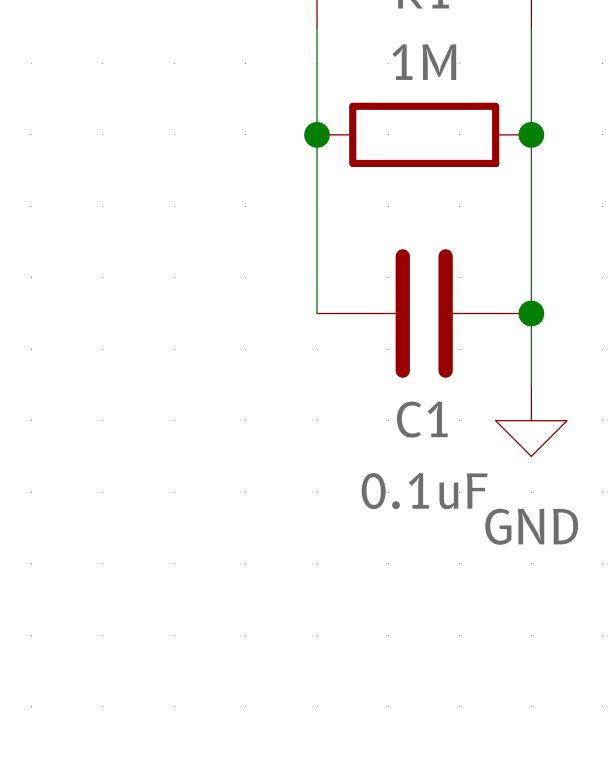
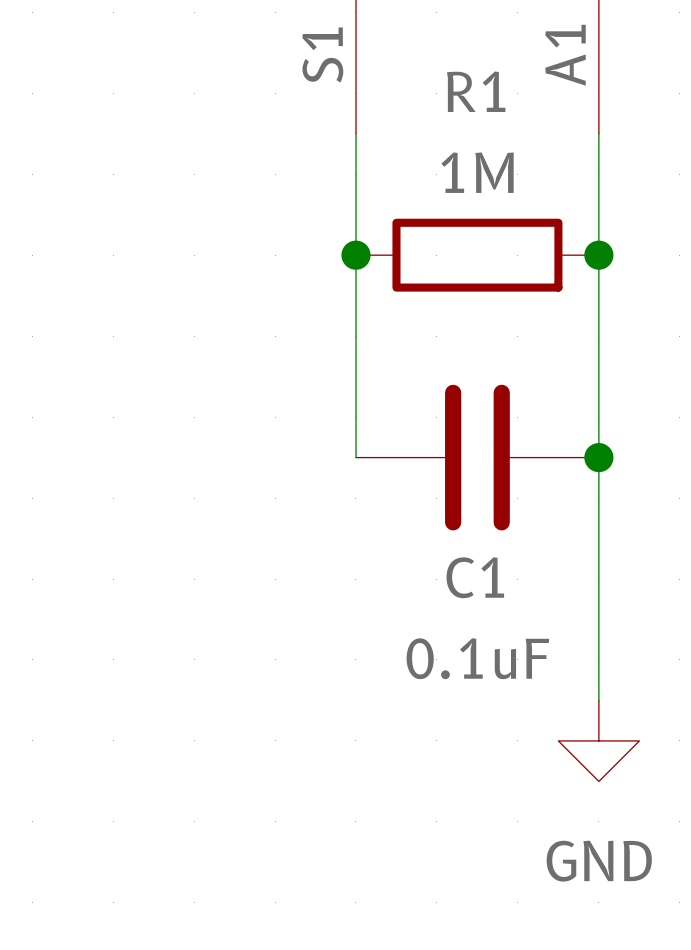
wire: none -> (598, 538) (598, 700)
power symbol position: GND (531, 420) -> GND (598, 740)

